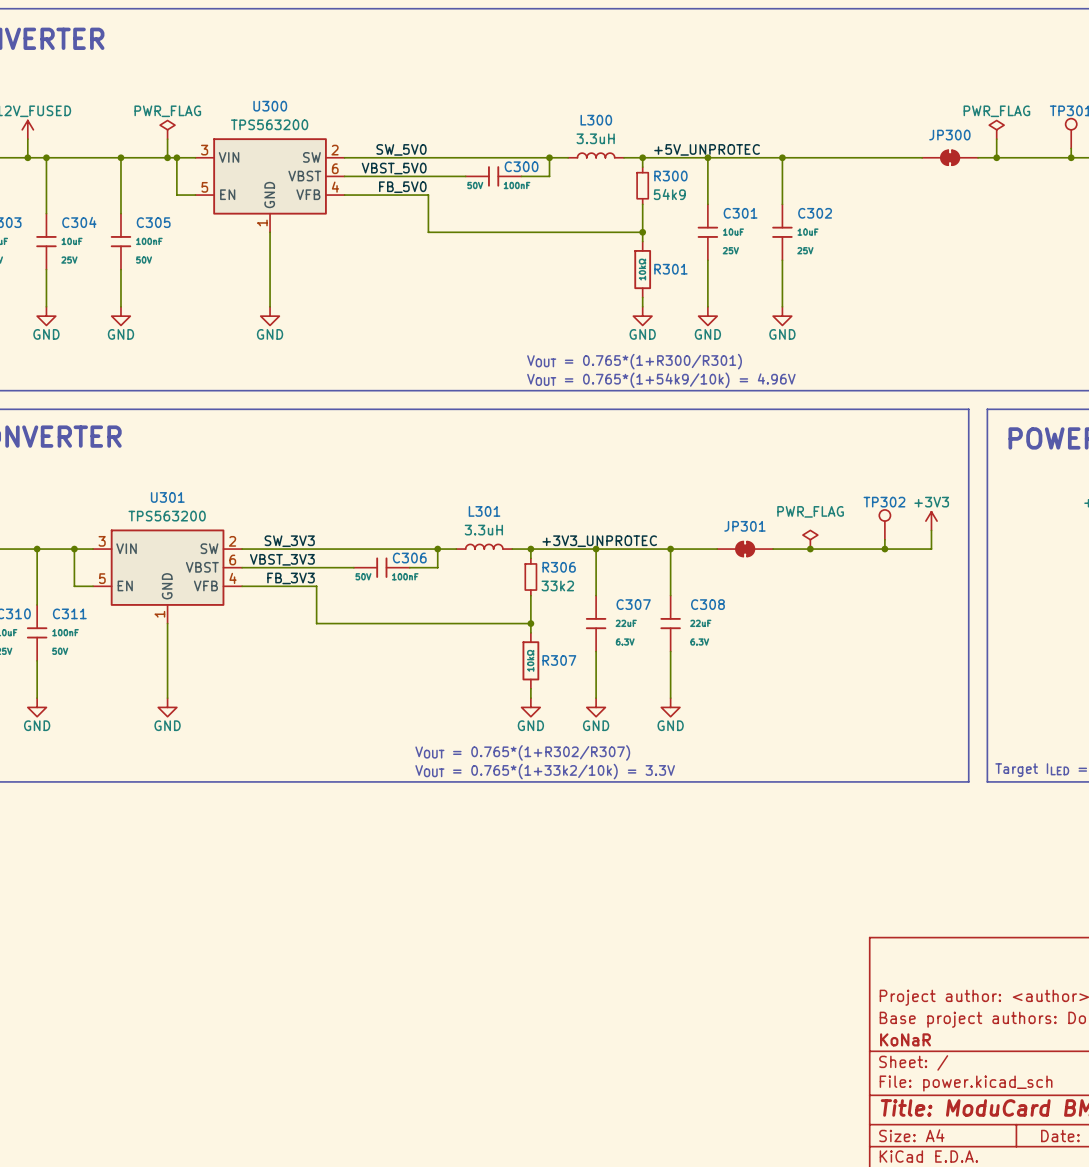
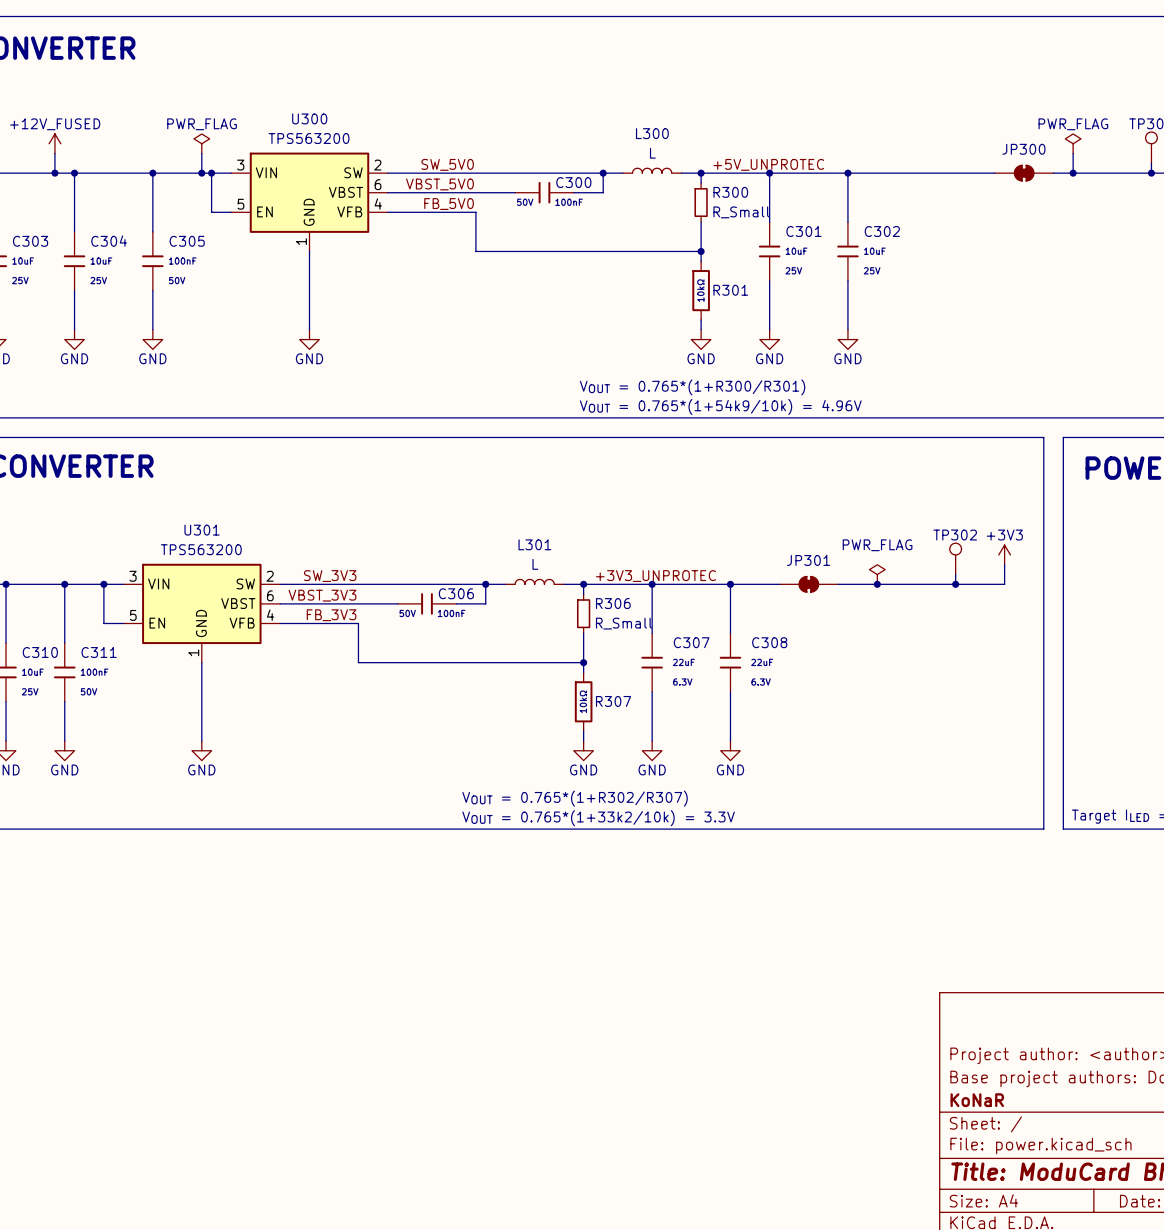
L300 value: 3.3uH (595, 138) -> L (652, 153)
R300 value: 54k9 (669, 194) -> R_Small (741, 212)
L301 value: 3.3uH (483, 530) -> L (535, 564)
R306 value: 33k2 (557, 585) -> R_Small (624, 623)

